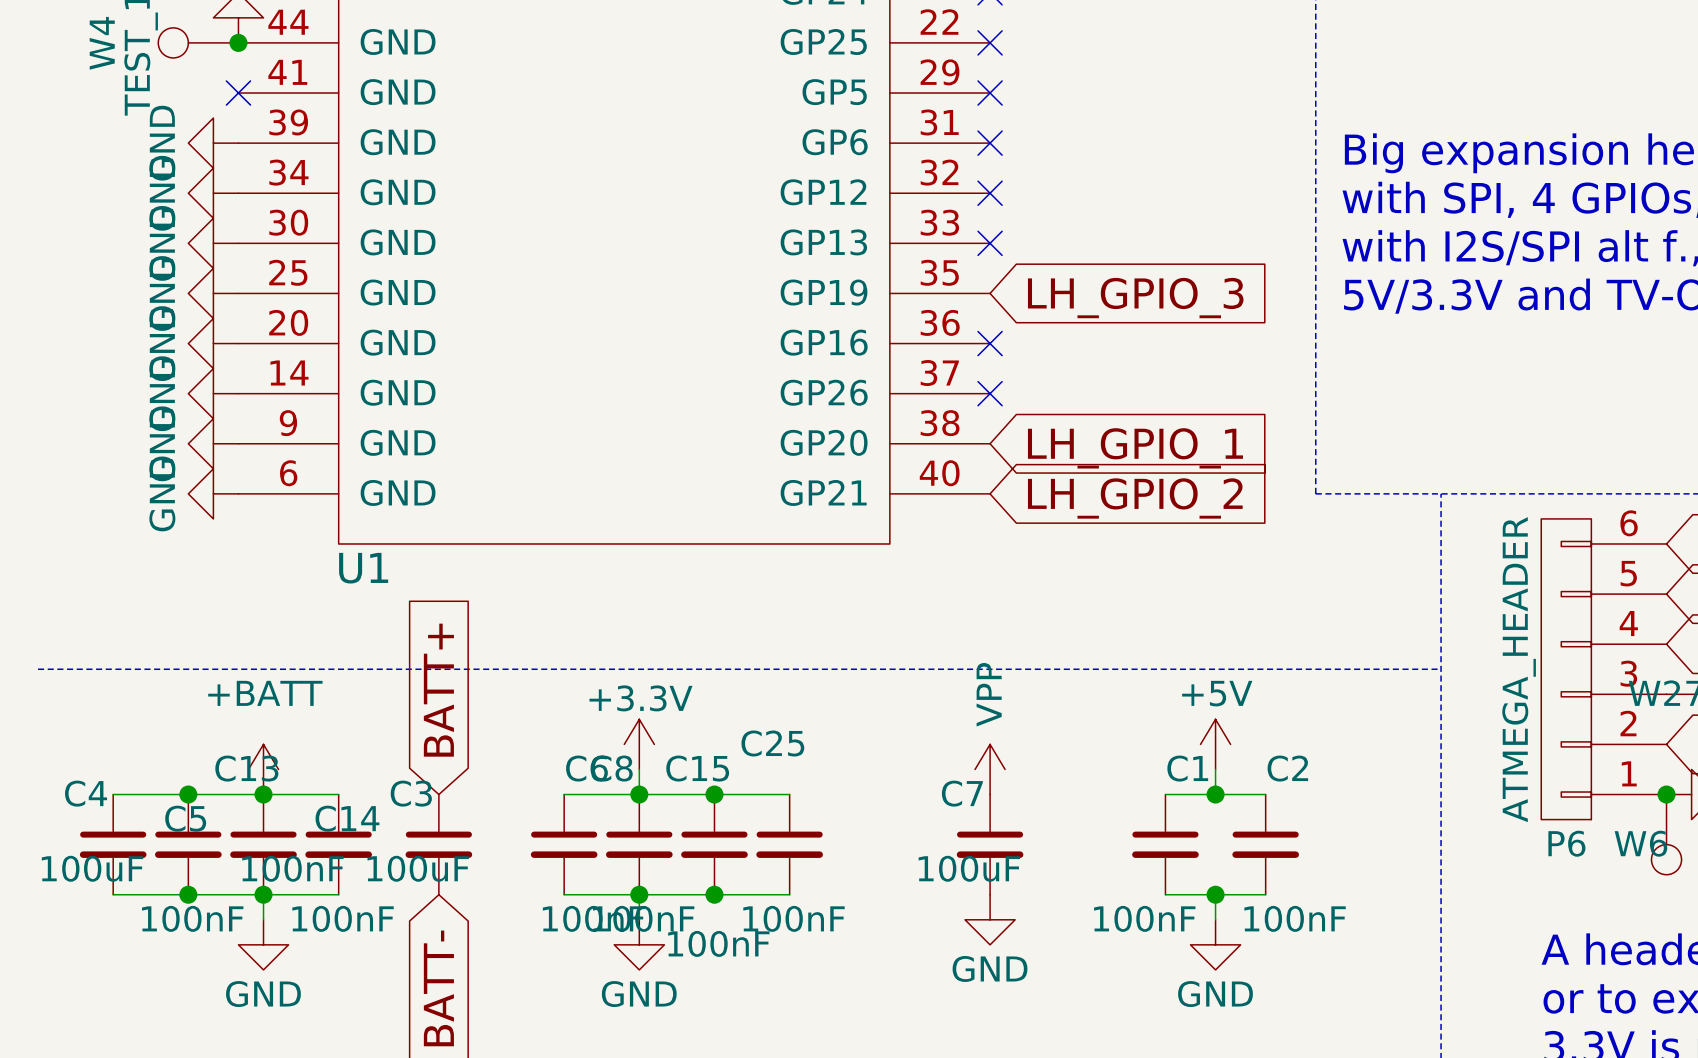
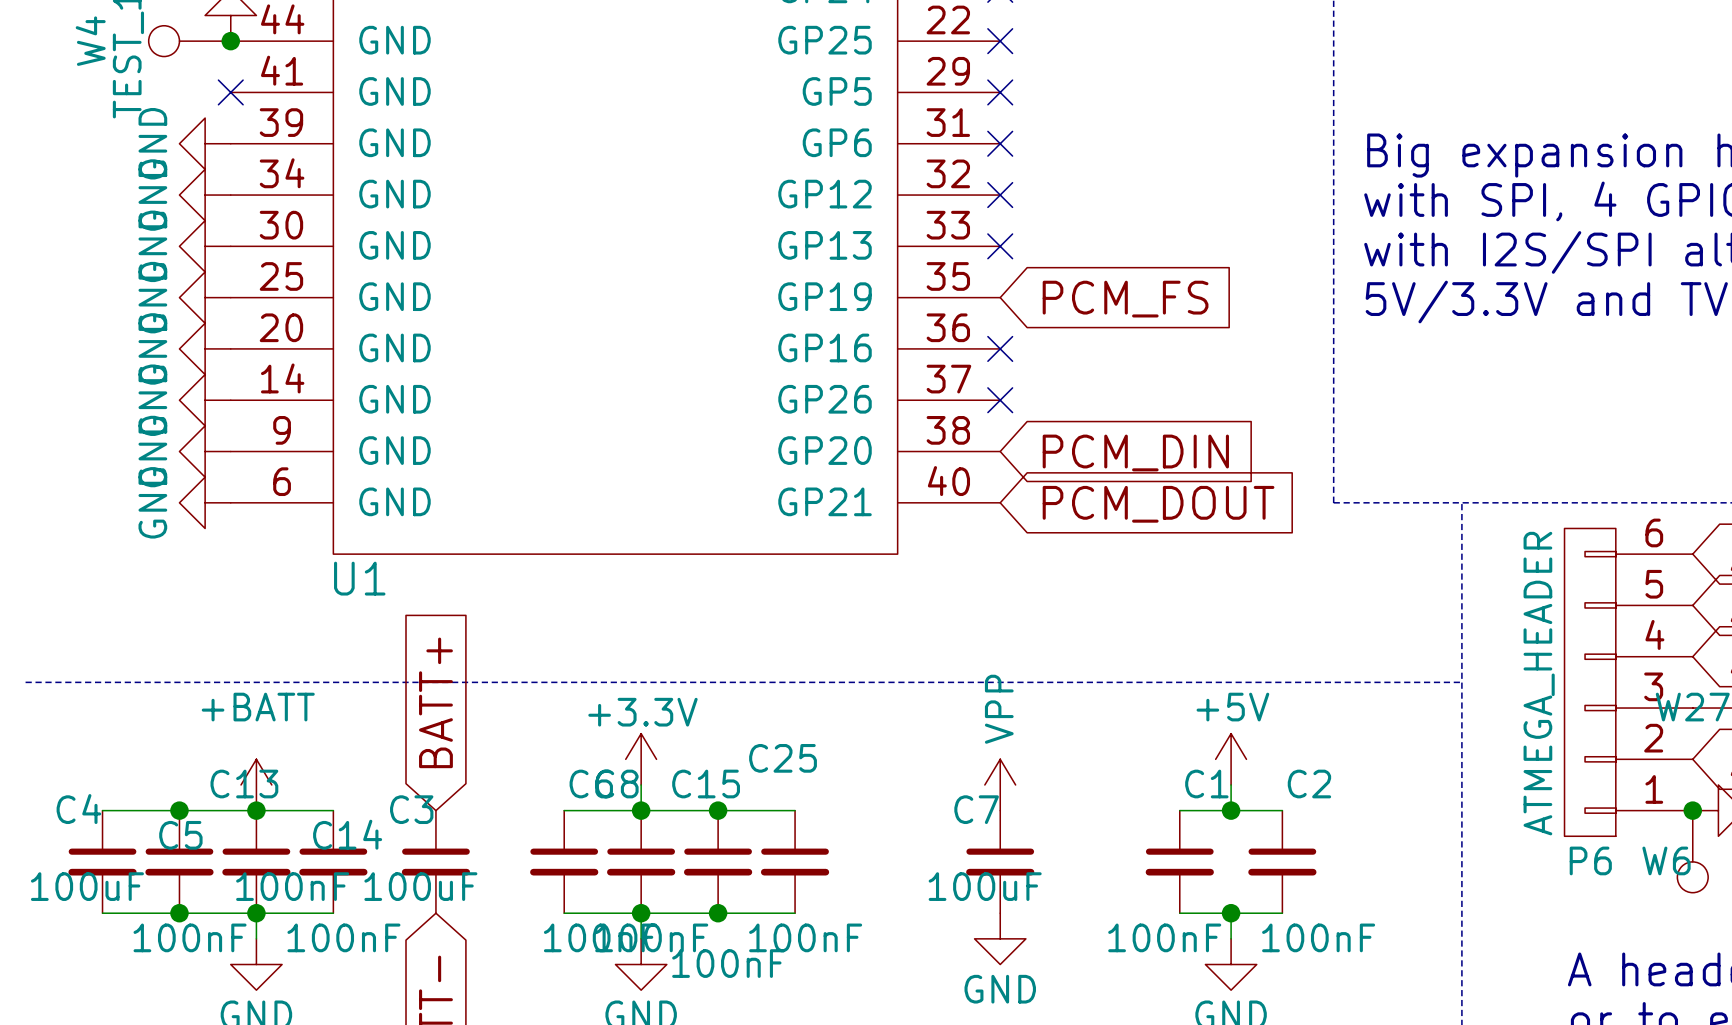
global label: LH_GPIO_3 (1135, 298) -> PCM_FS (1125, 299)
global label: LH_GPIO_1 (1135, 448) -> PCM_DIN (1135, 452)
global label: LH_GPIO_2 (1135, 498) -> PCM_DOUT (1158, 504)

